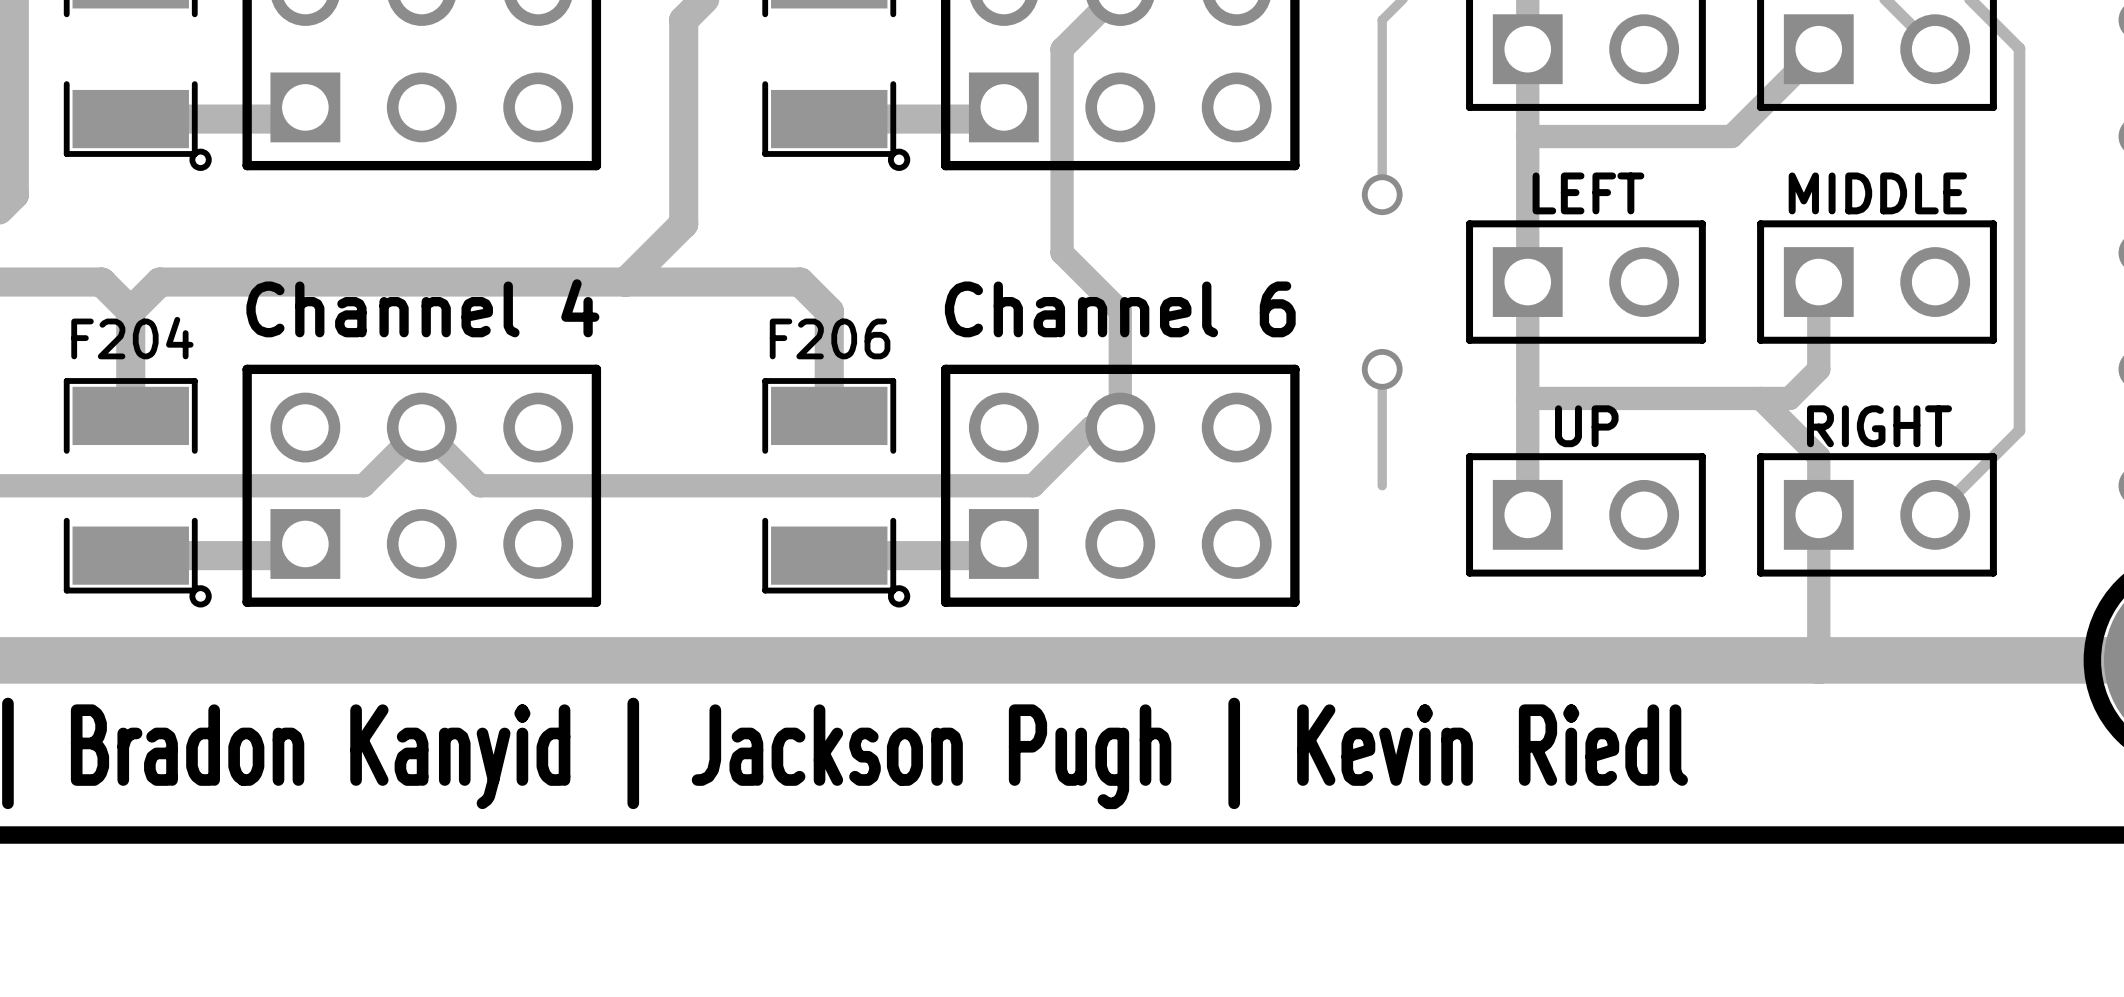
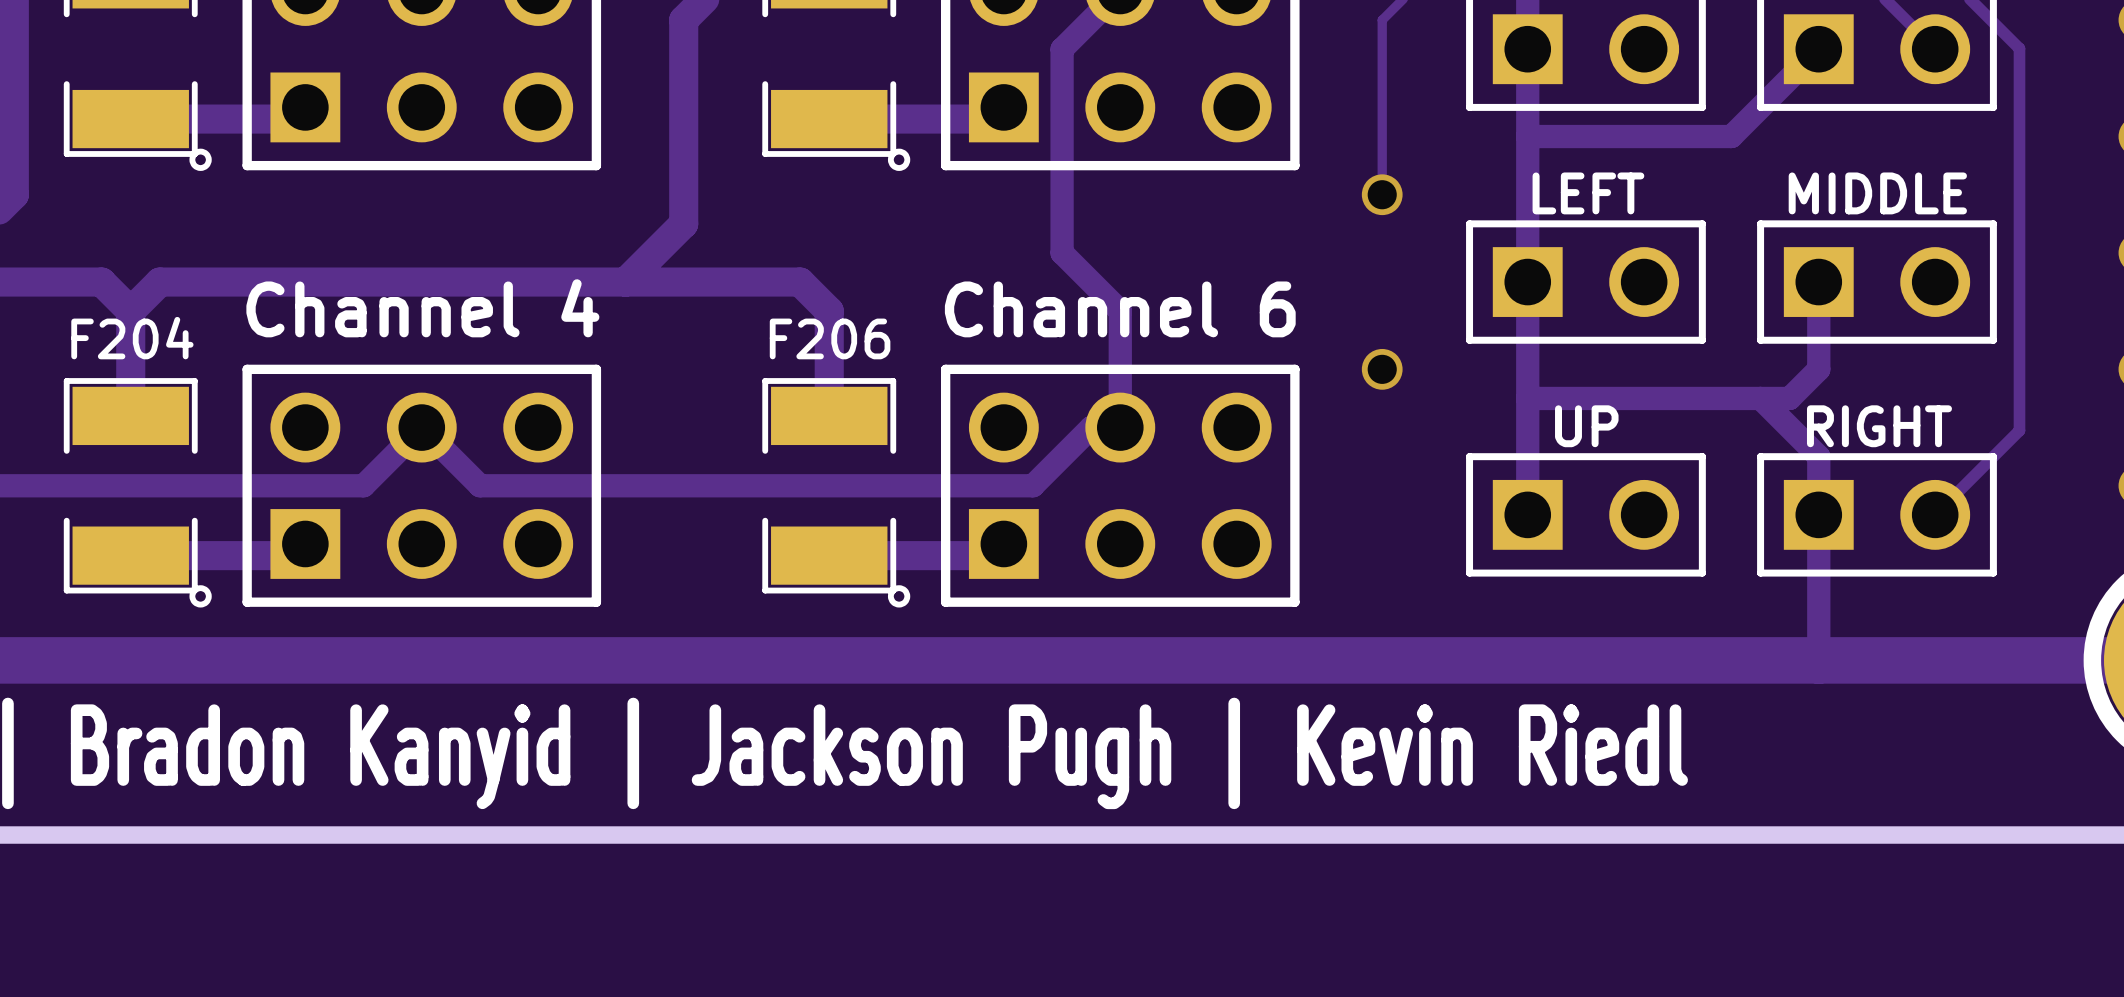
track: (1382, 369) (1382, 485) -> none

